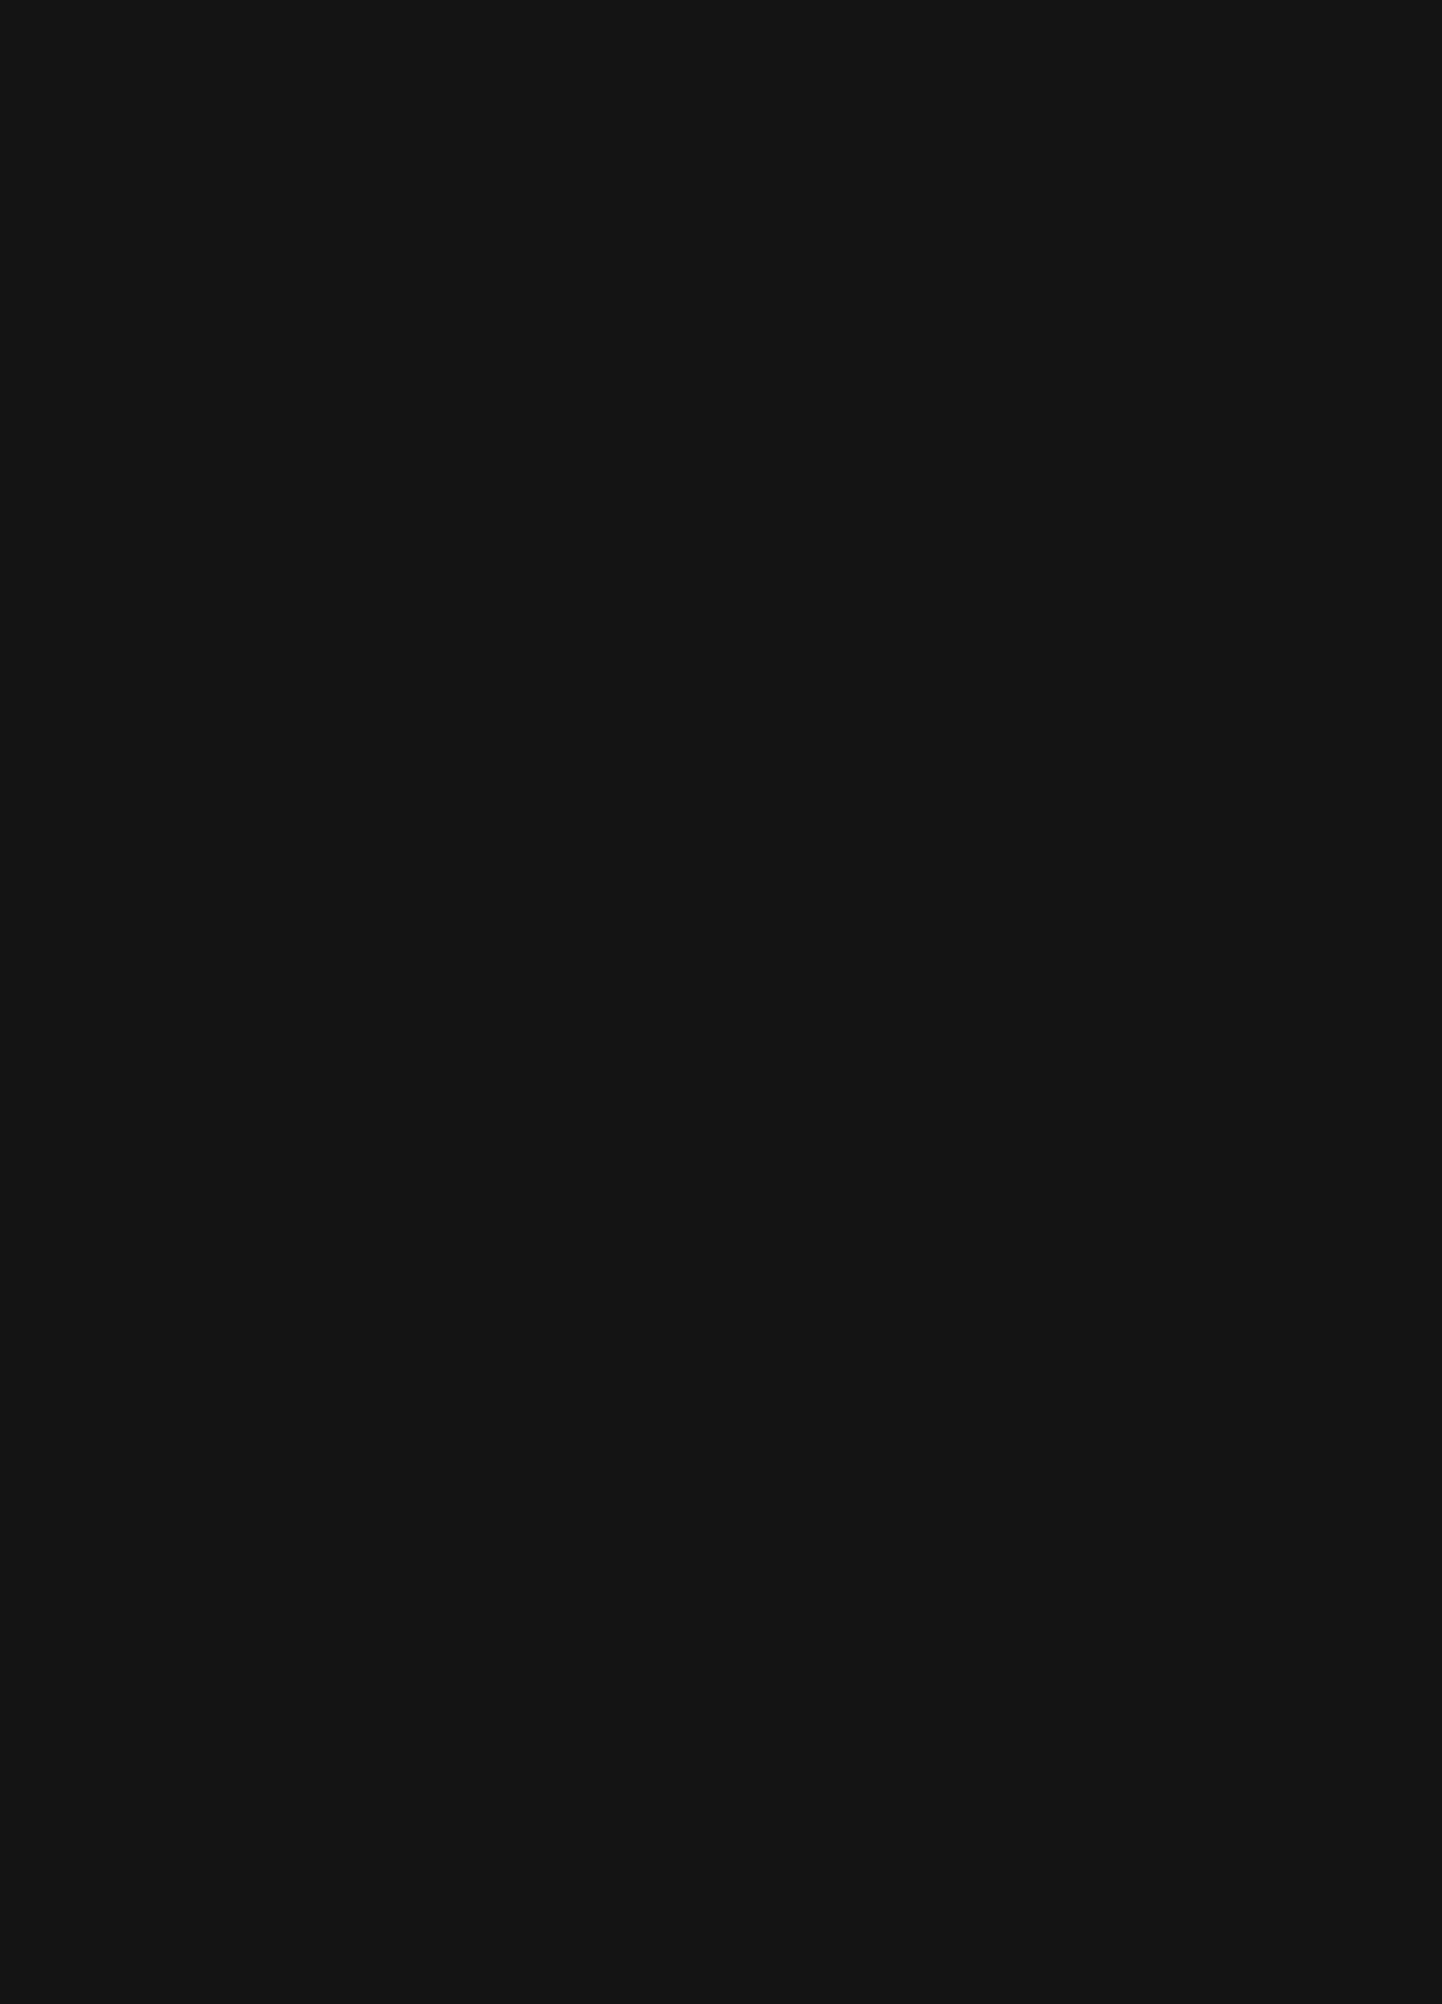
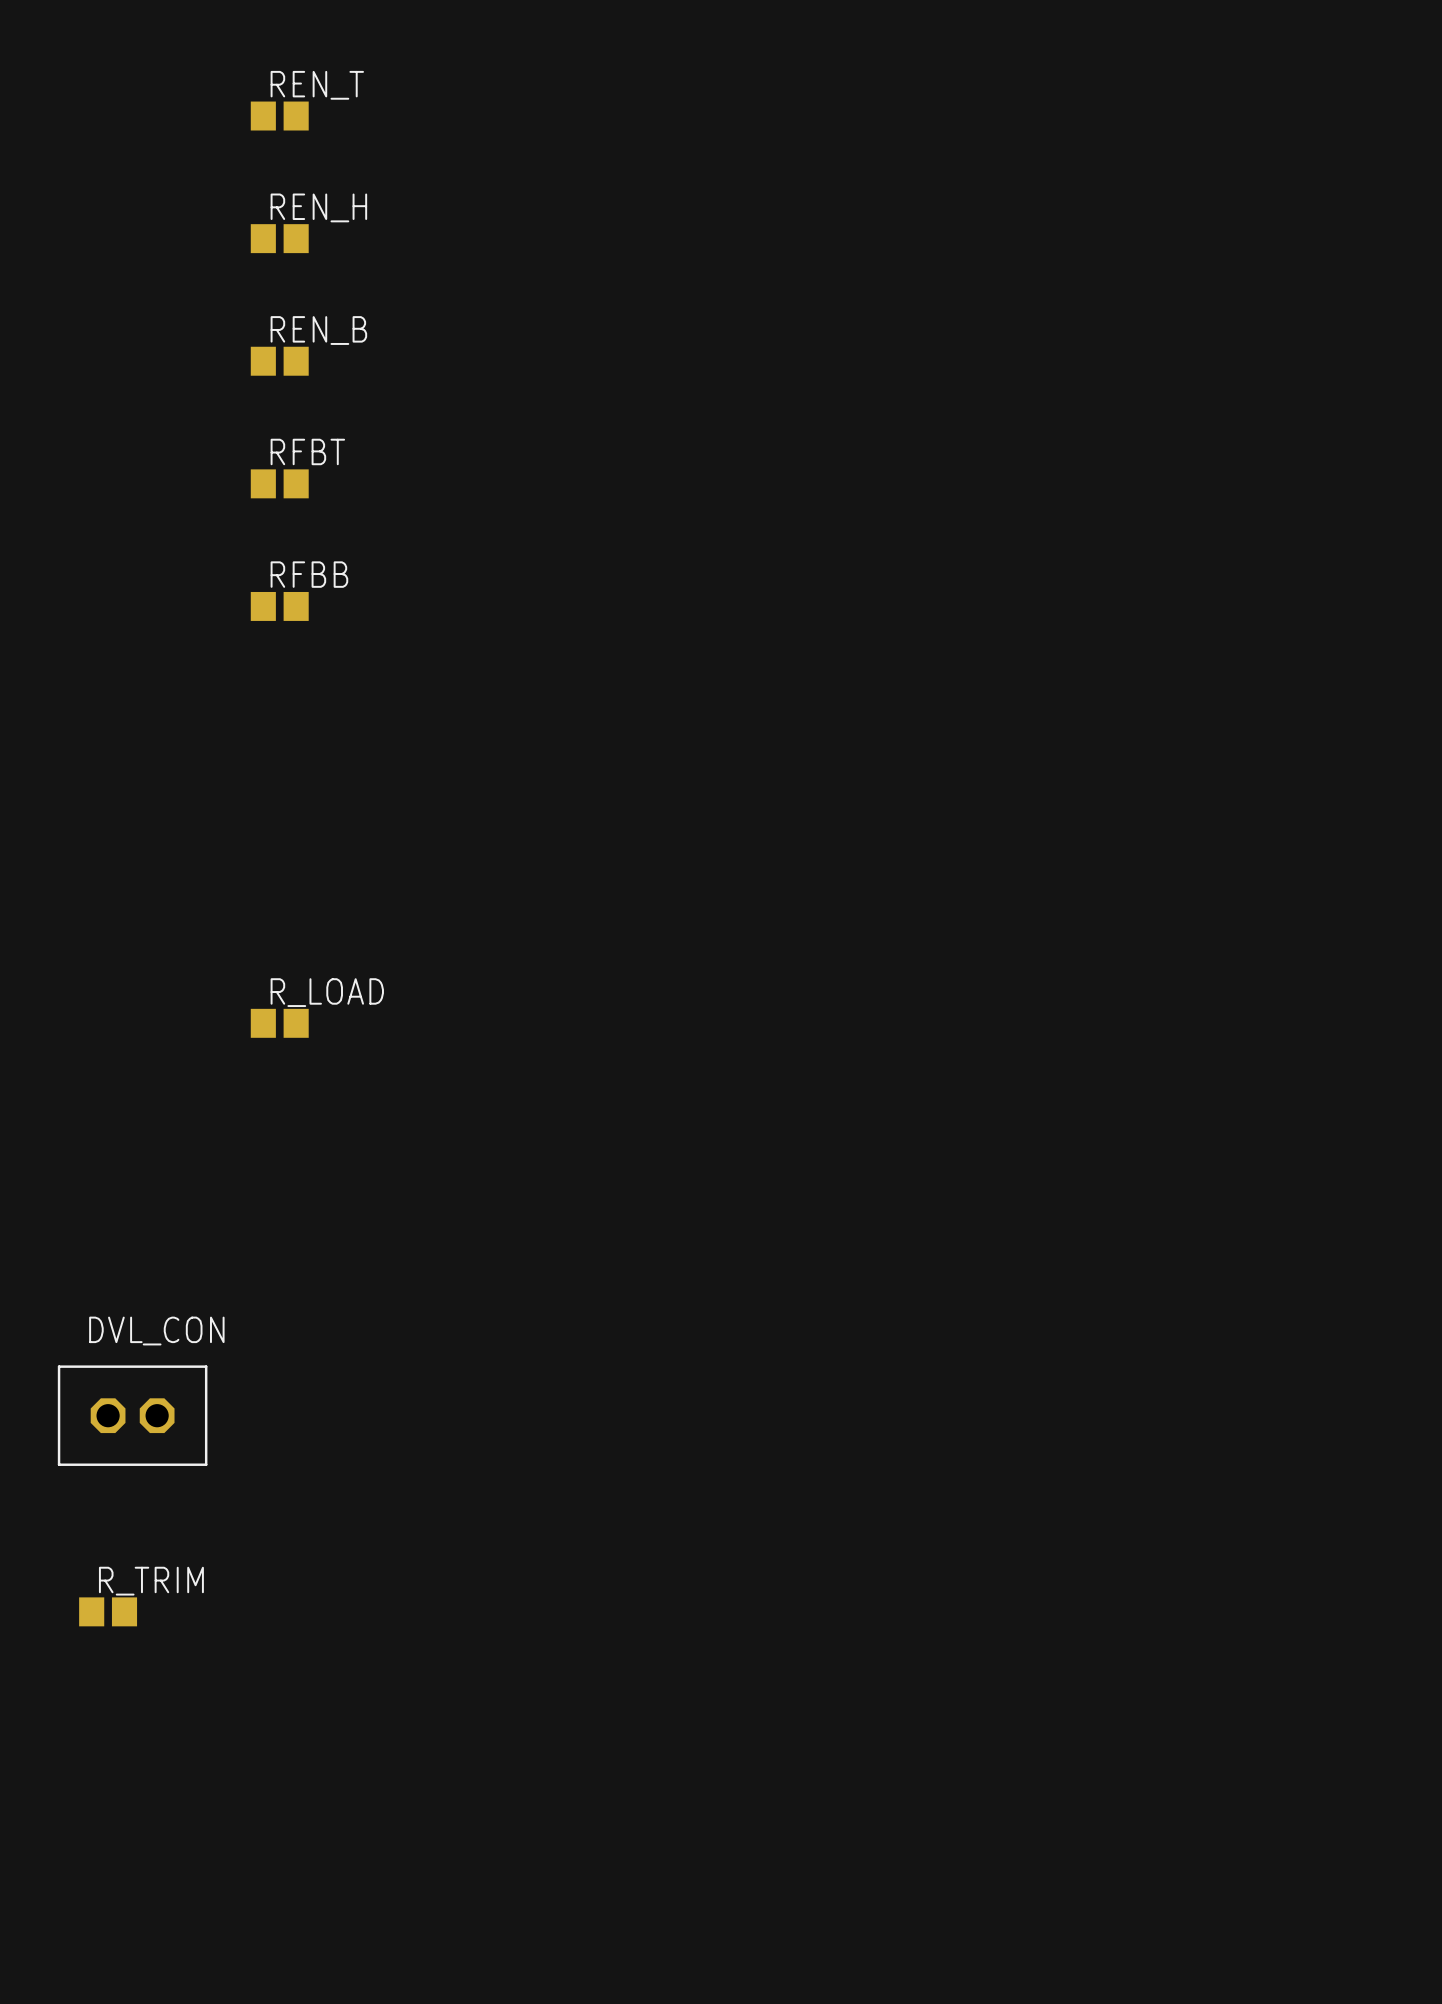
REN_T: none -> (279, 116)
REN_H: none -> (279, 238)
REN_B: none -> (279, 361)
RFBT: none -> (279, 483)
RFBB: none -> (279, 606)
R_LOAD: none -> (279, 1023)
DVL_CON: none -> (132, 1415)
R_TRIM: none -> (108, 1611)

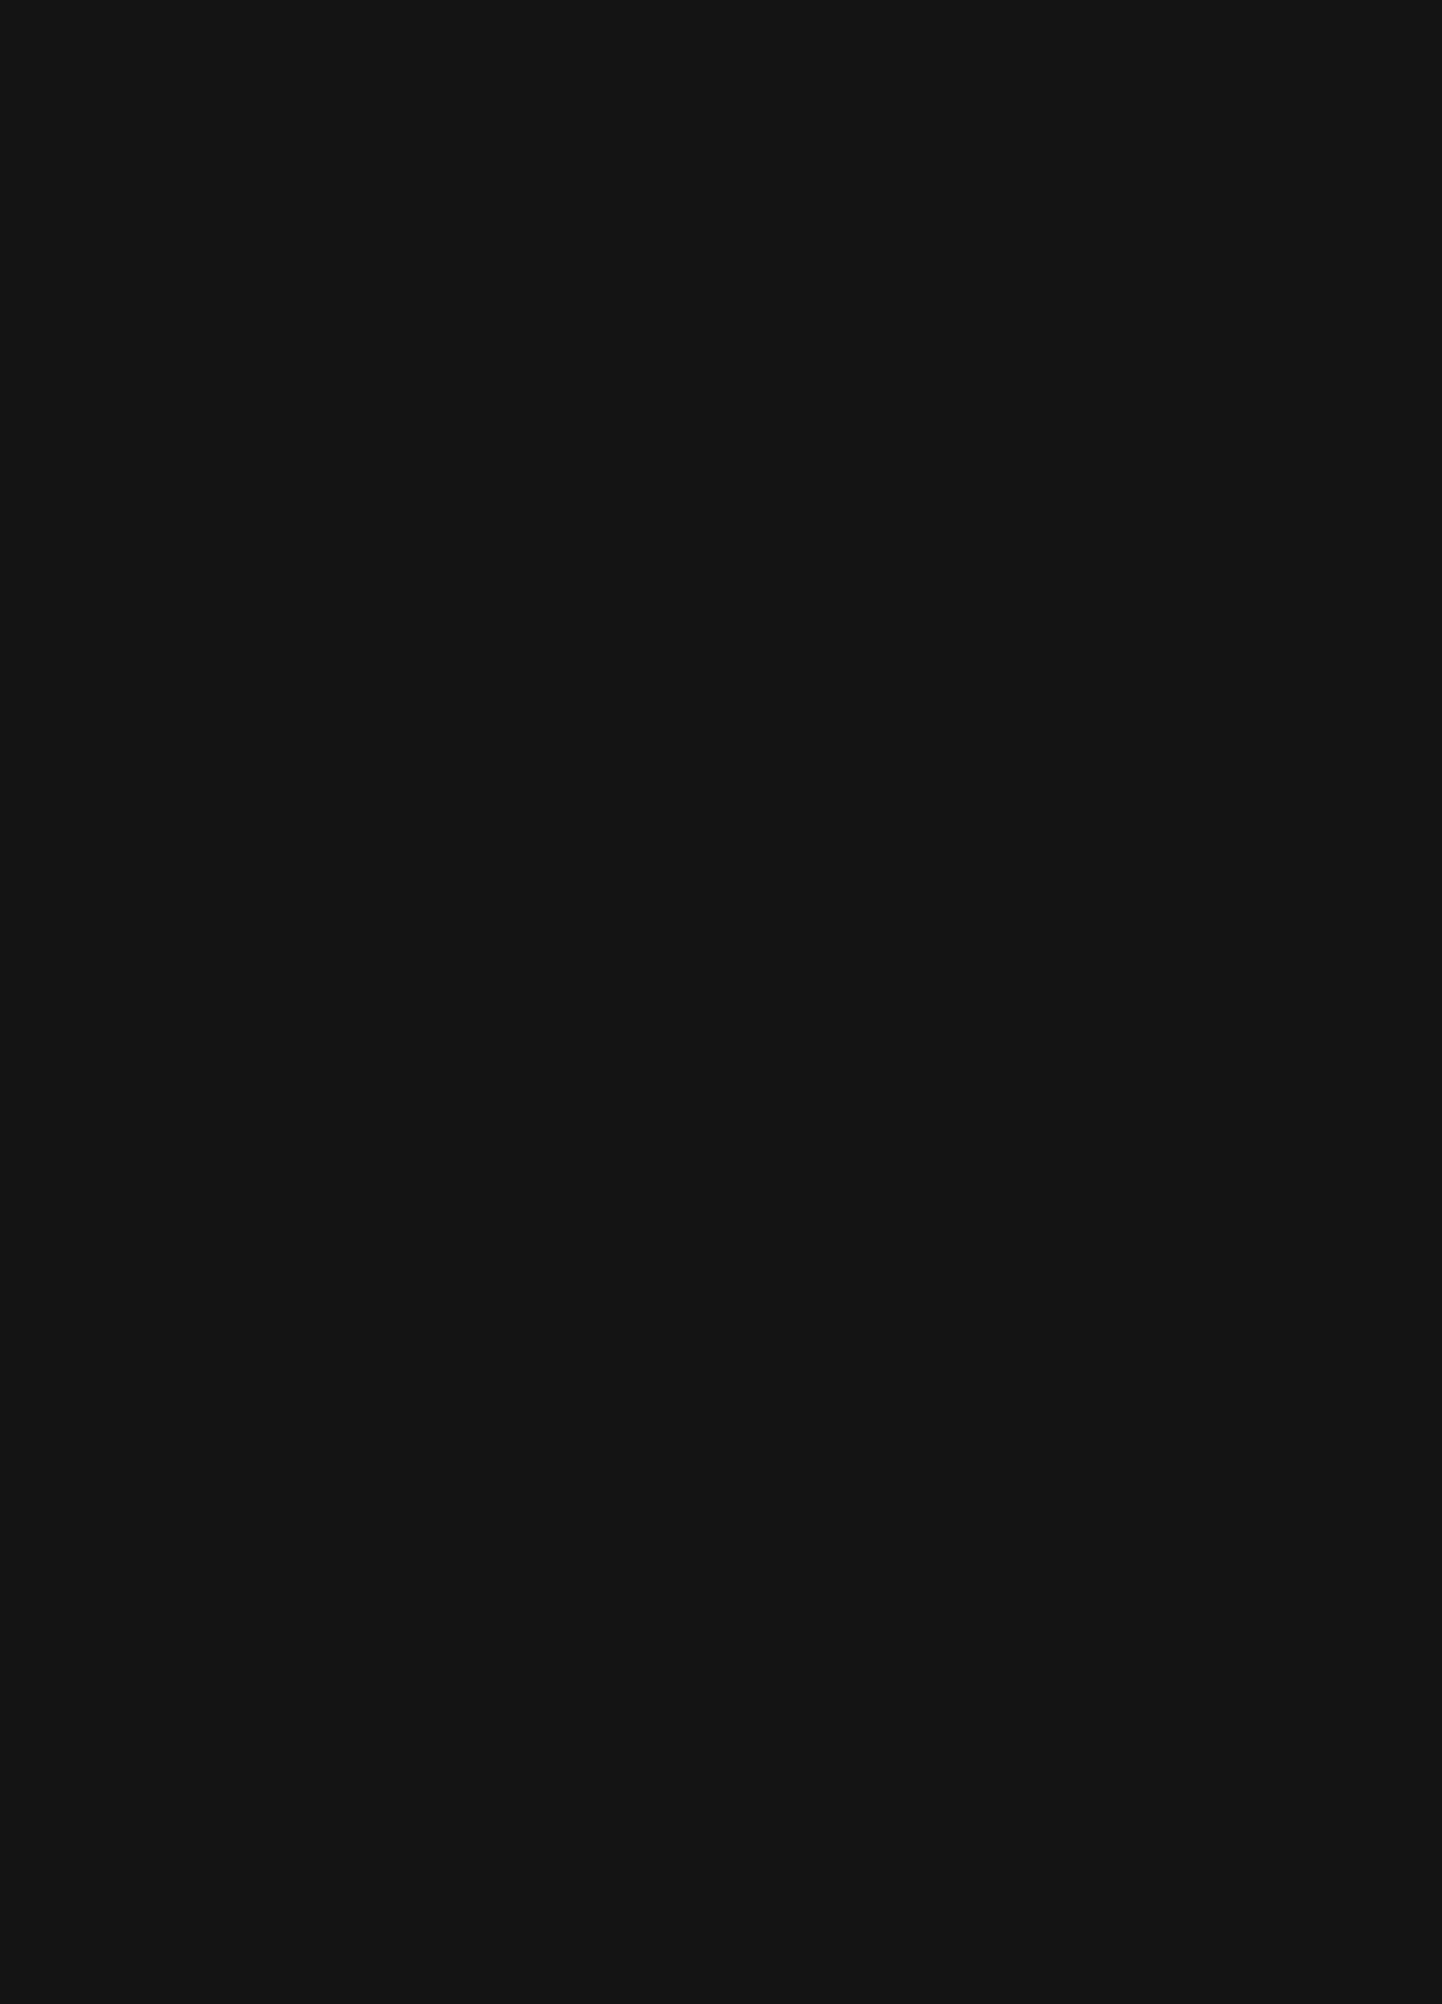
REN_T: (279, 116) -> none
REN_H: (279, 238) -> none
REN_B: (279, 361) -> none
RFBT: (279, 483) -> none
RFBB: (279, 606) -> none
R_LOAD: (279, 1023) -> none
DVL_CON: (132, 1415) -> none
R_TRIM: (108, 1611) -> none

